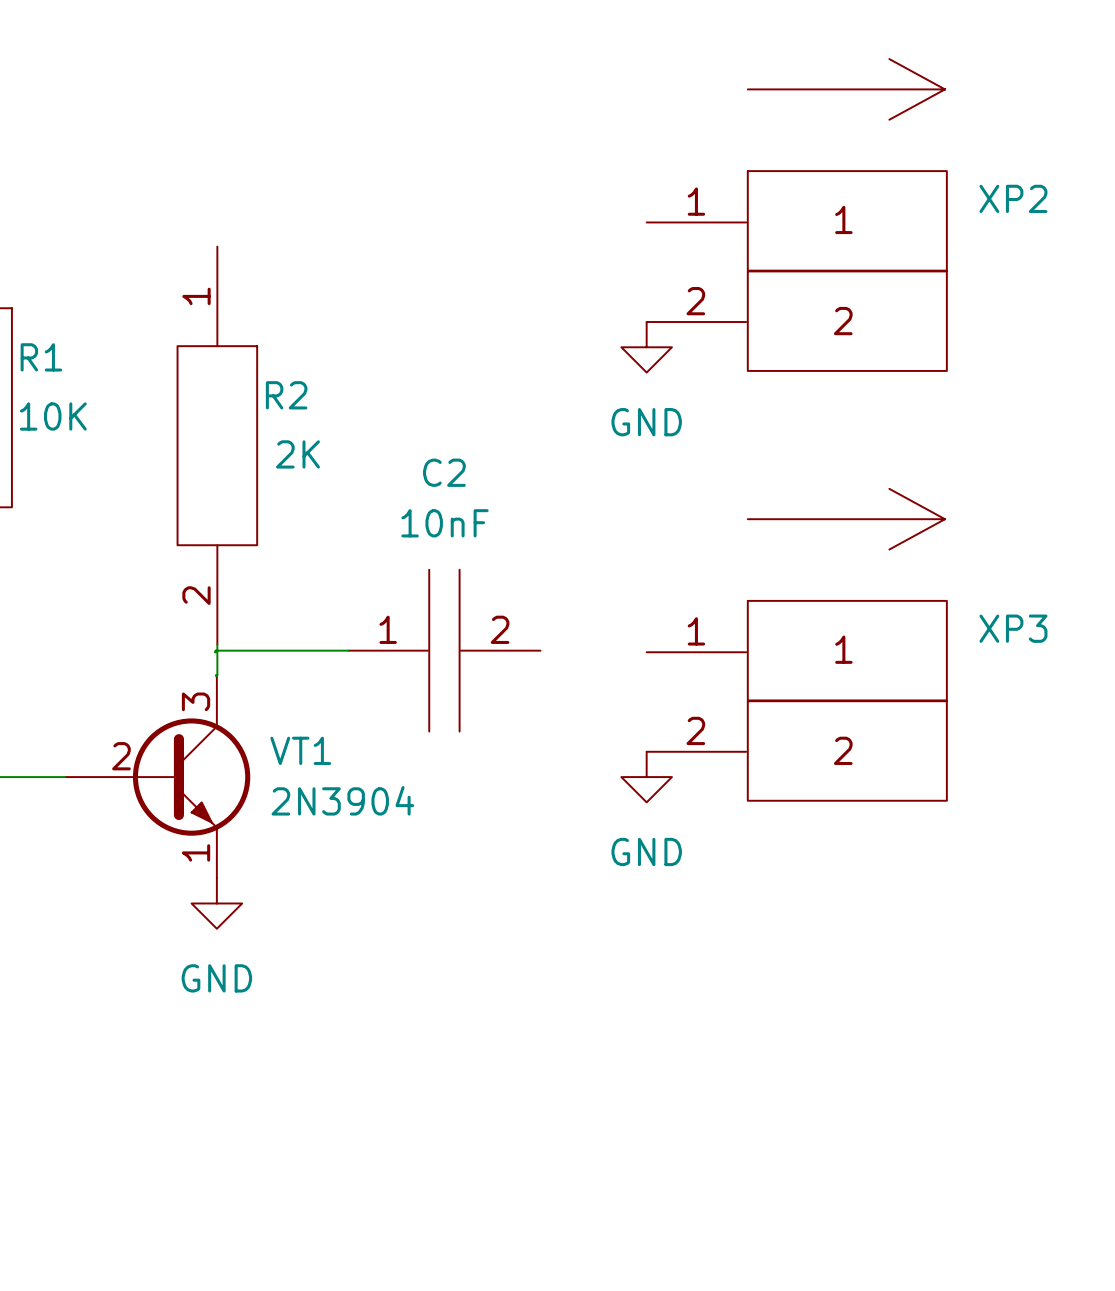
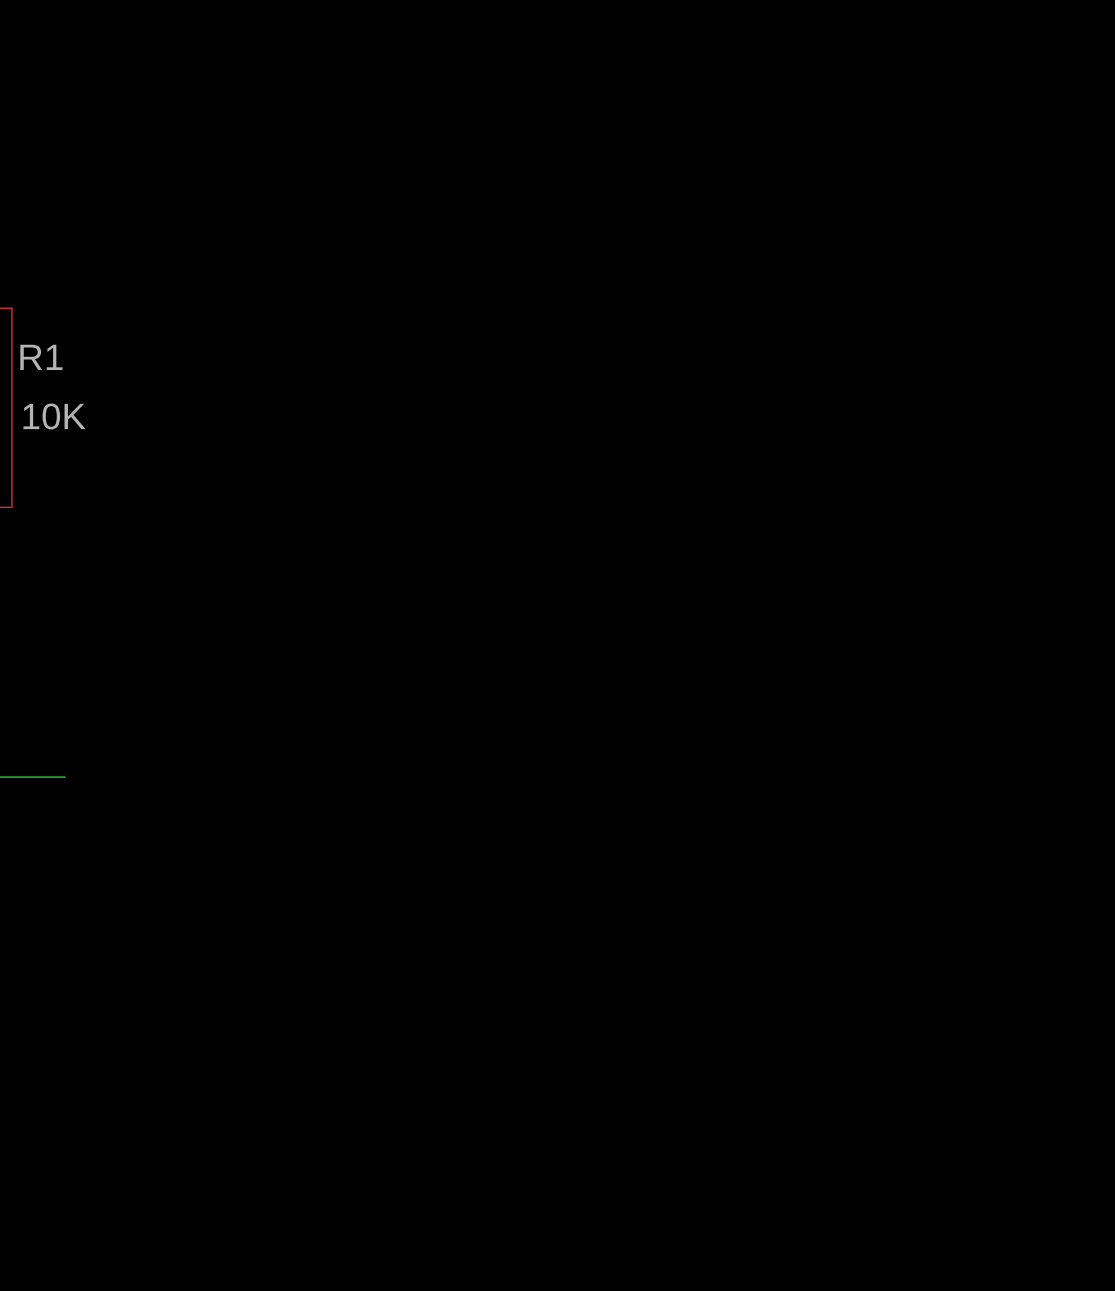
XP2: (796, 212) -> none
power symbol: GND (646, 347) -> none
R2: 2K (217, 445) -> none
XP3: (796, 642) -> none
wire: (217, 644) (216, 676) -> none
wire: (348, 650) (215, 650) (214, 652) -> none
C2: 10nF (444, 650) -> none
VT1: 2N3904 (157, 777) -> none
power symbol: GND (646, 777) -> none
power symbol: GND (216, 903) -> none

